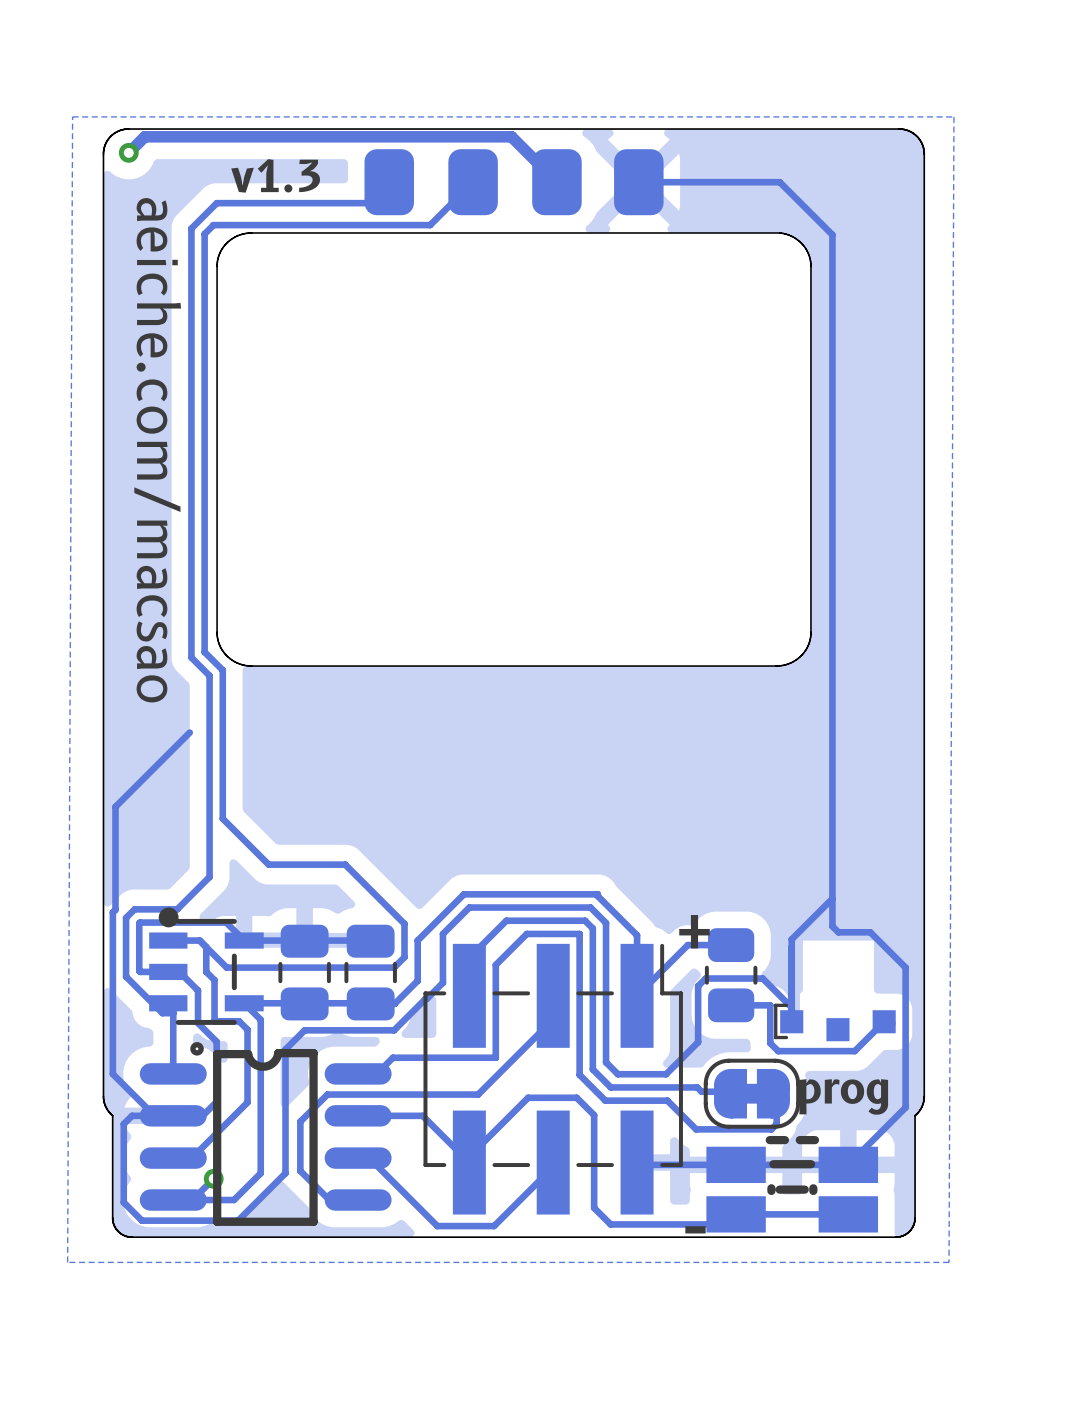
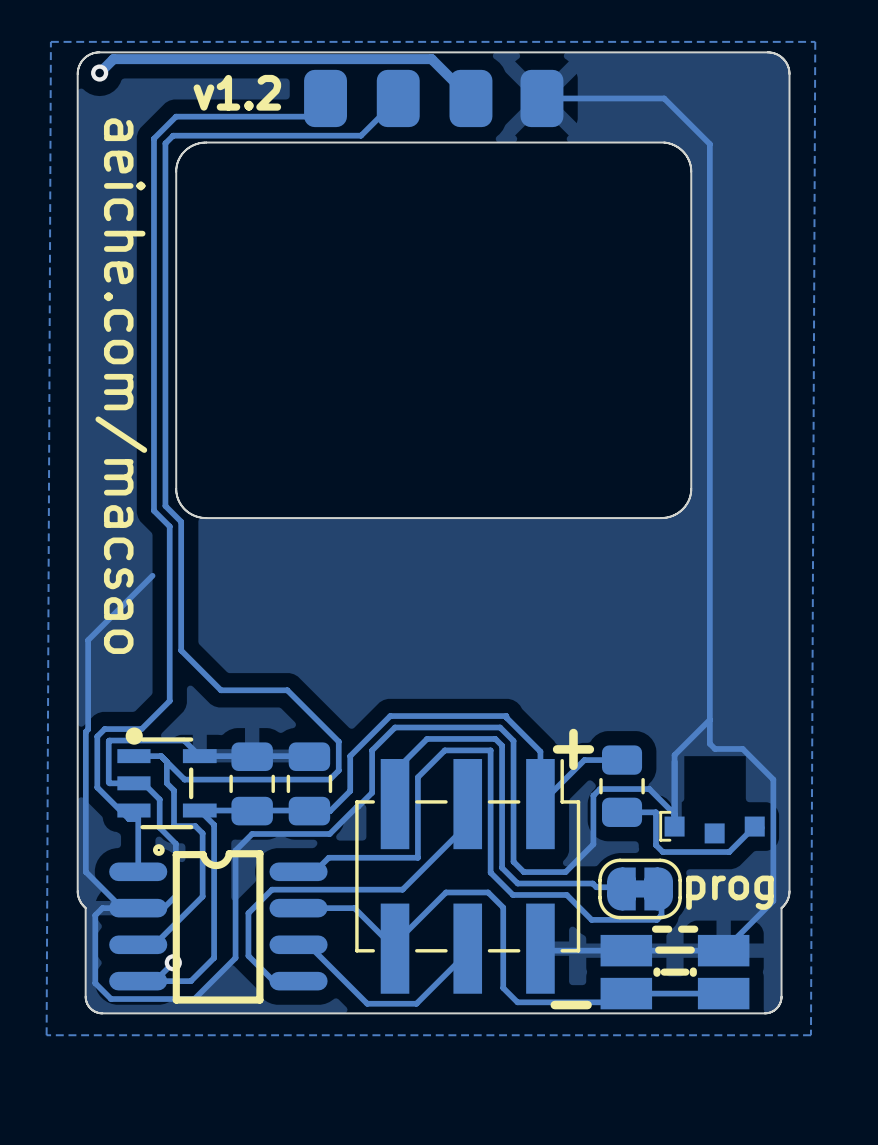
text: v1.3 (275, 175) -> v1.2 (237, 92)

